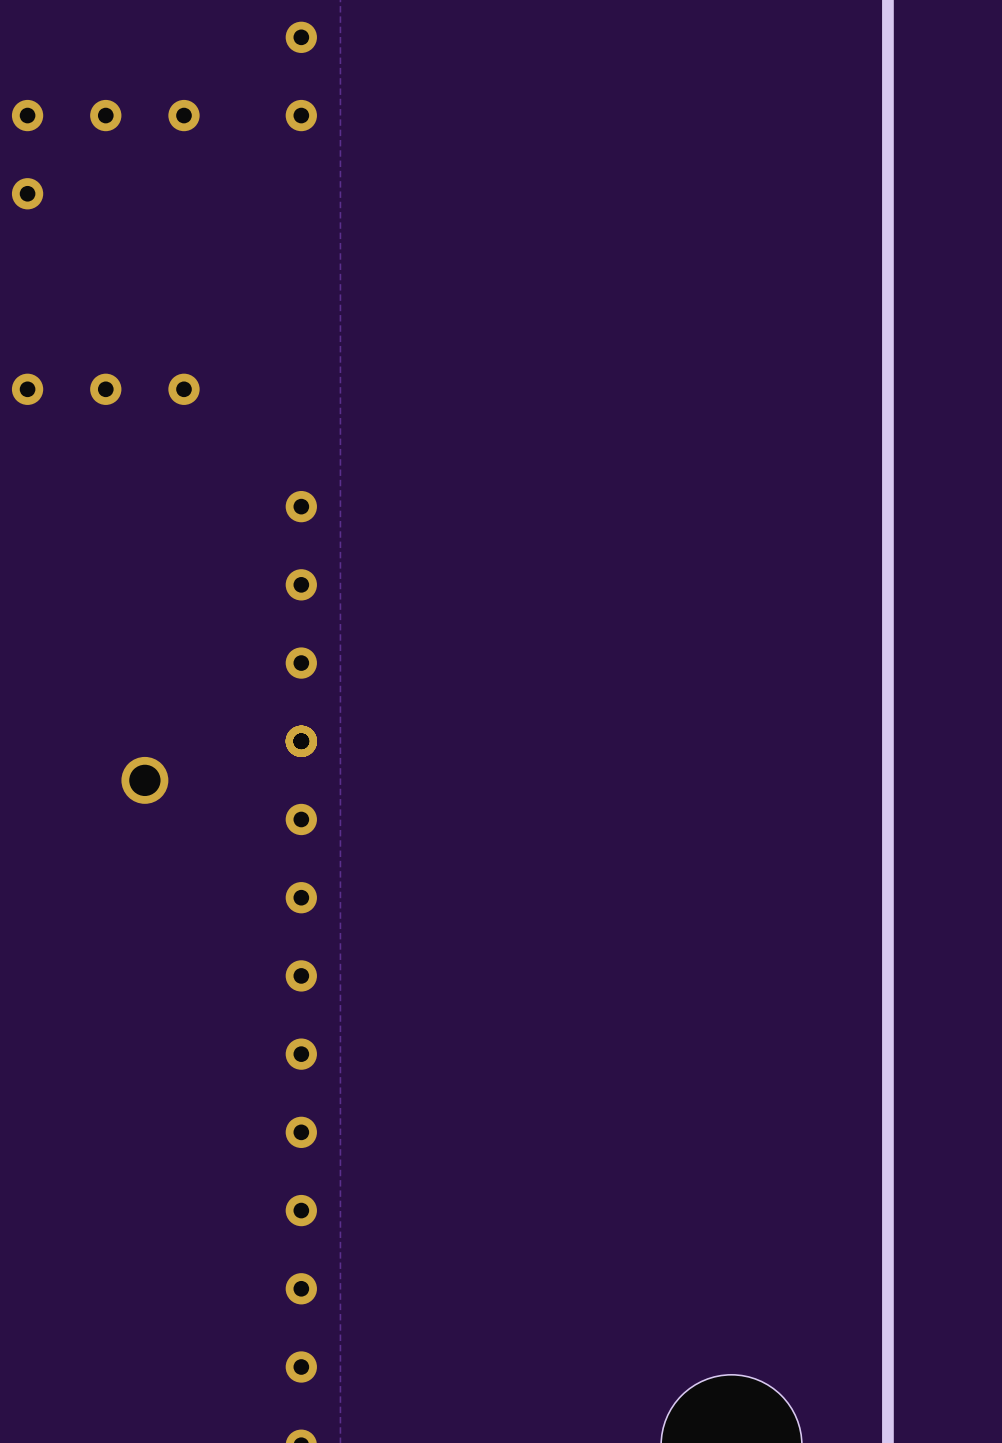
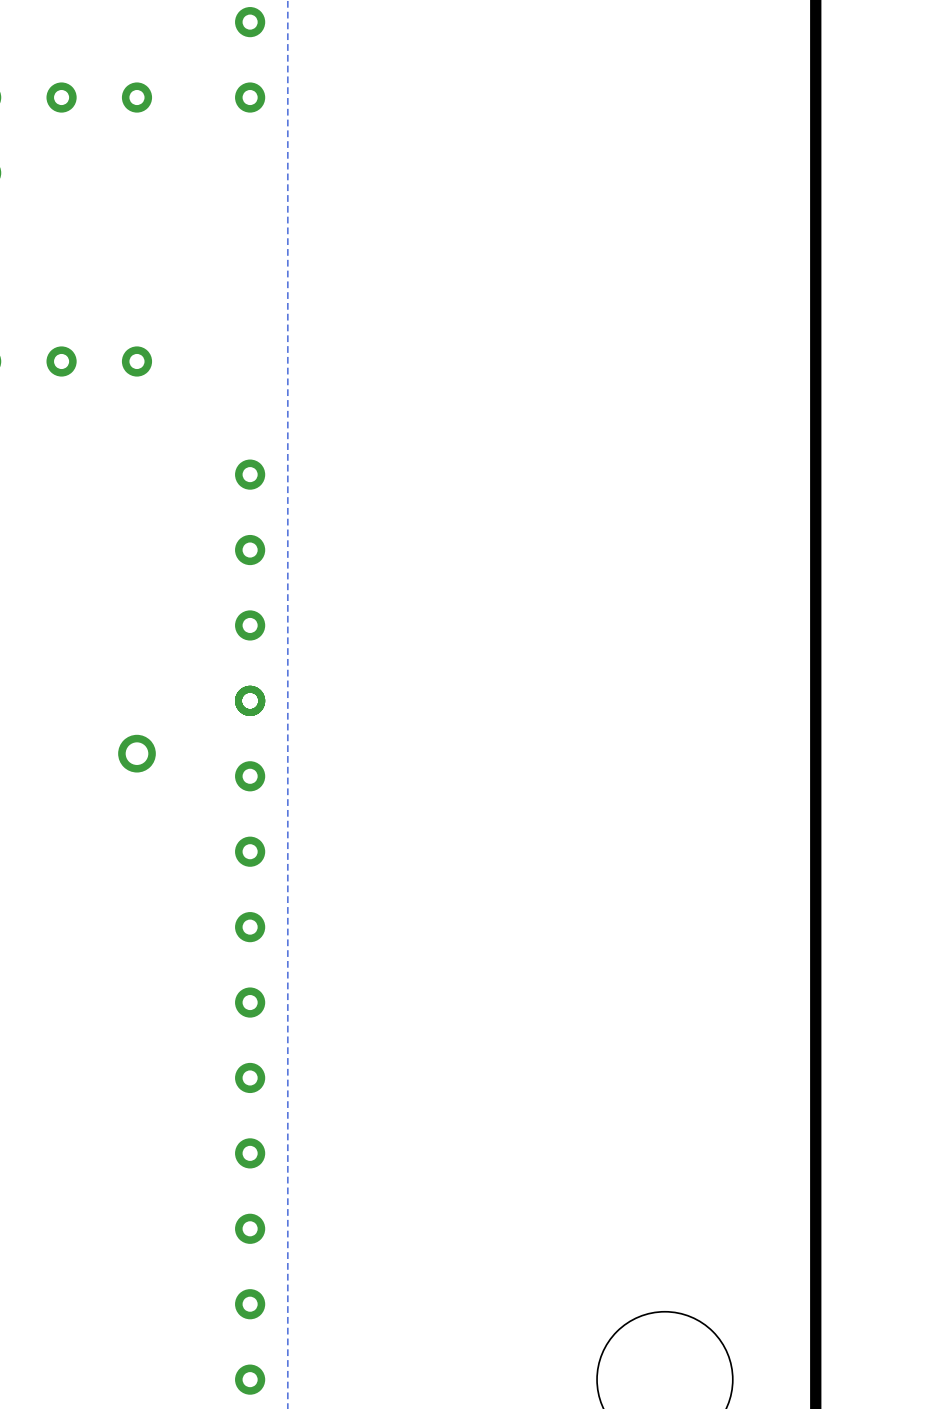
via position: (144, 780) -> (136, 753)

